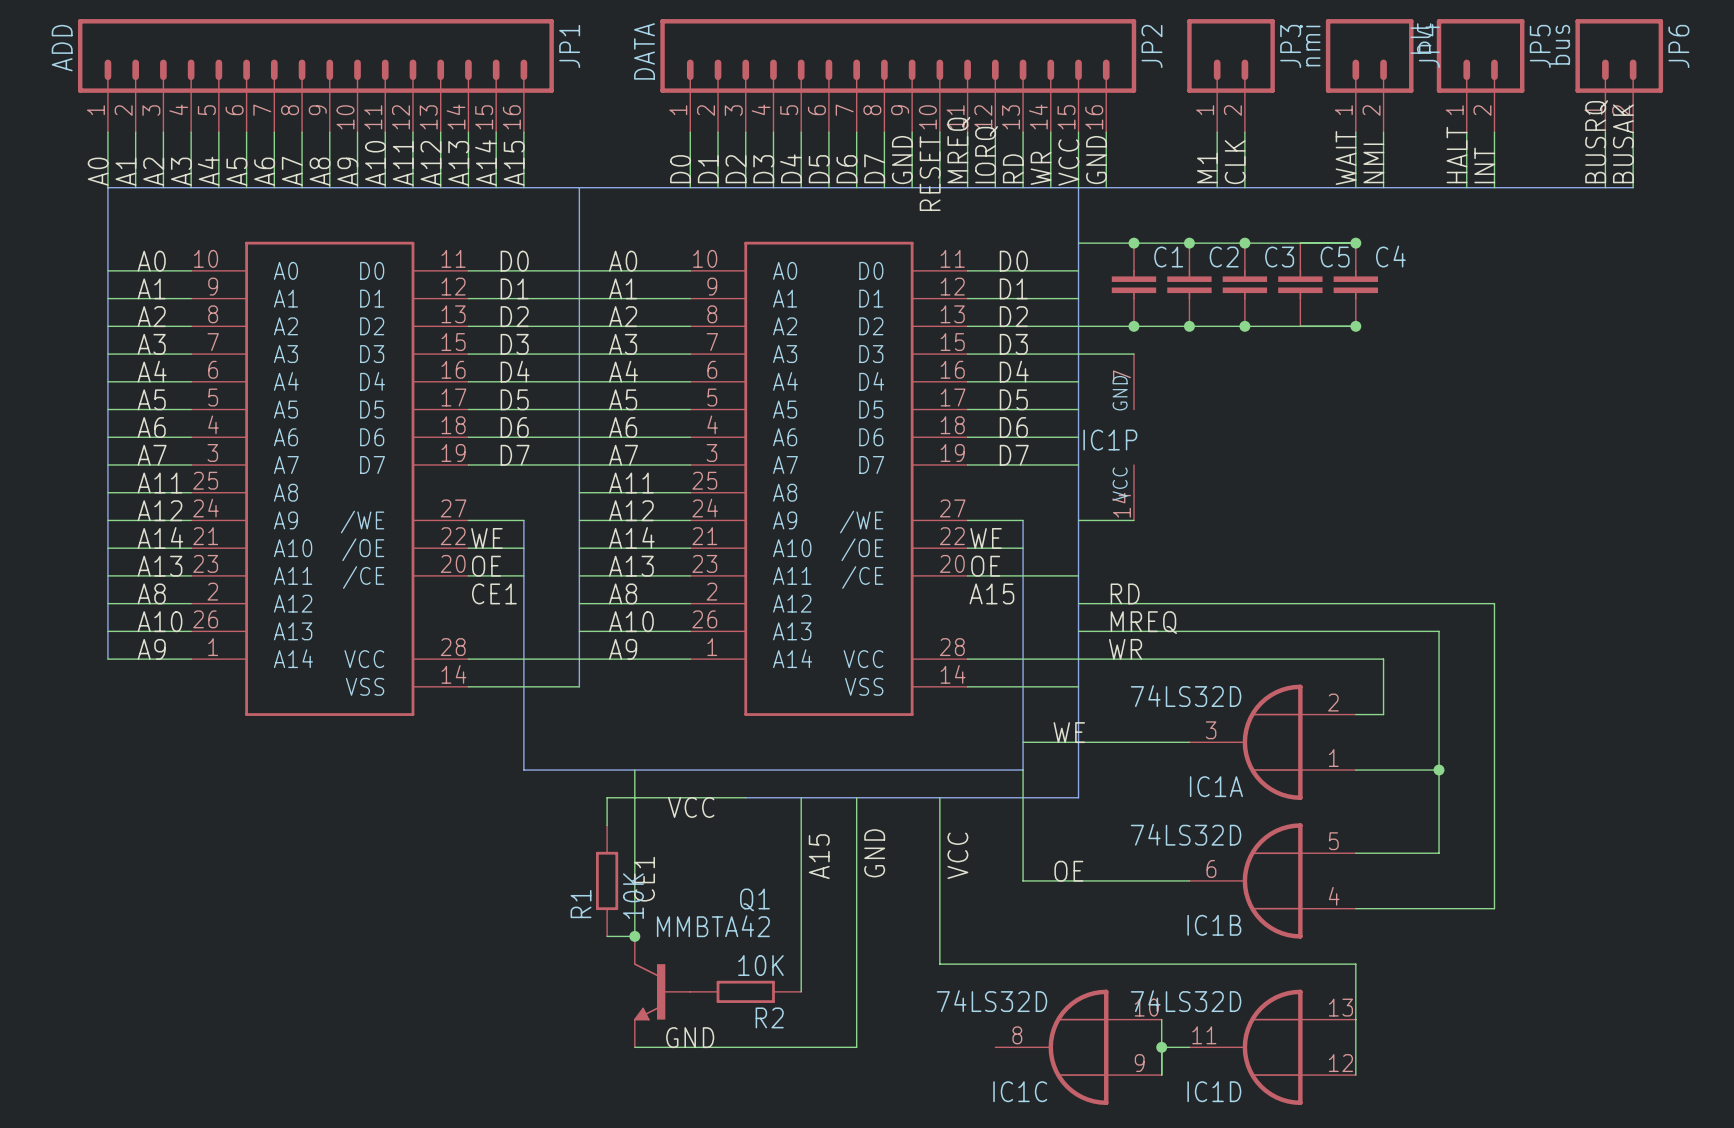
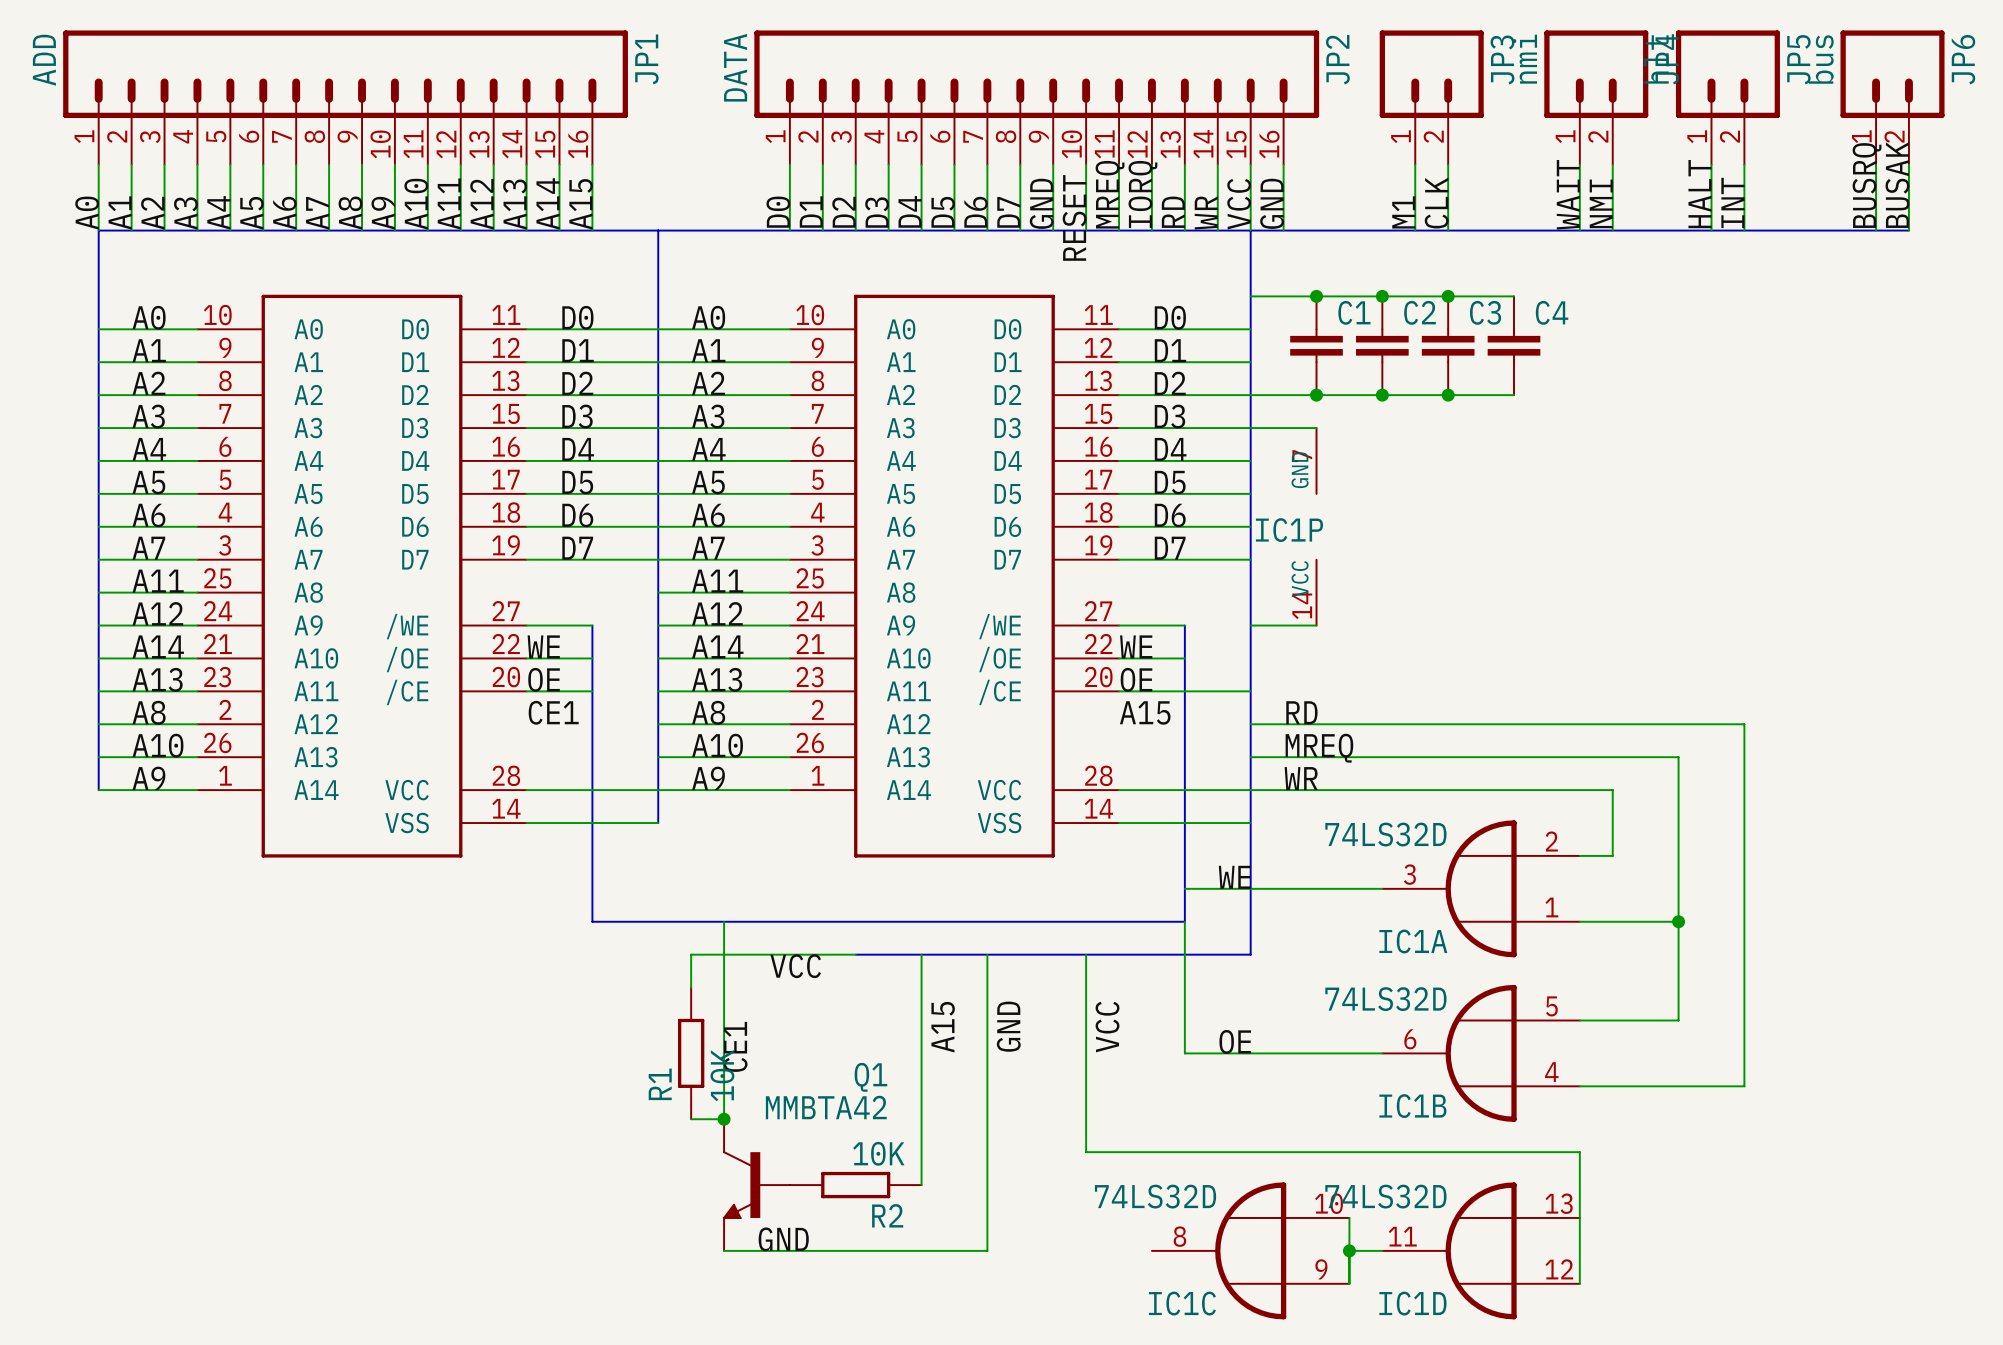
wire: (1300, 243) (1355, 243) -> none
junction: (1355, 243) -> none
C5 name: C5 (1335, 257) -> C4 (1552, 312)
C4: (1355, 284) -> none
wire: (1300, 326) (1355, 326) -> none
junction: (1355, 326) -> none

